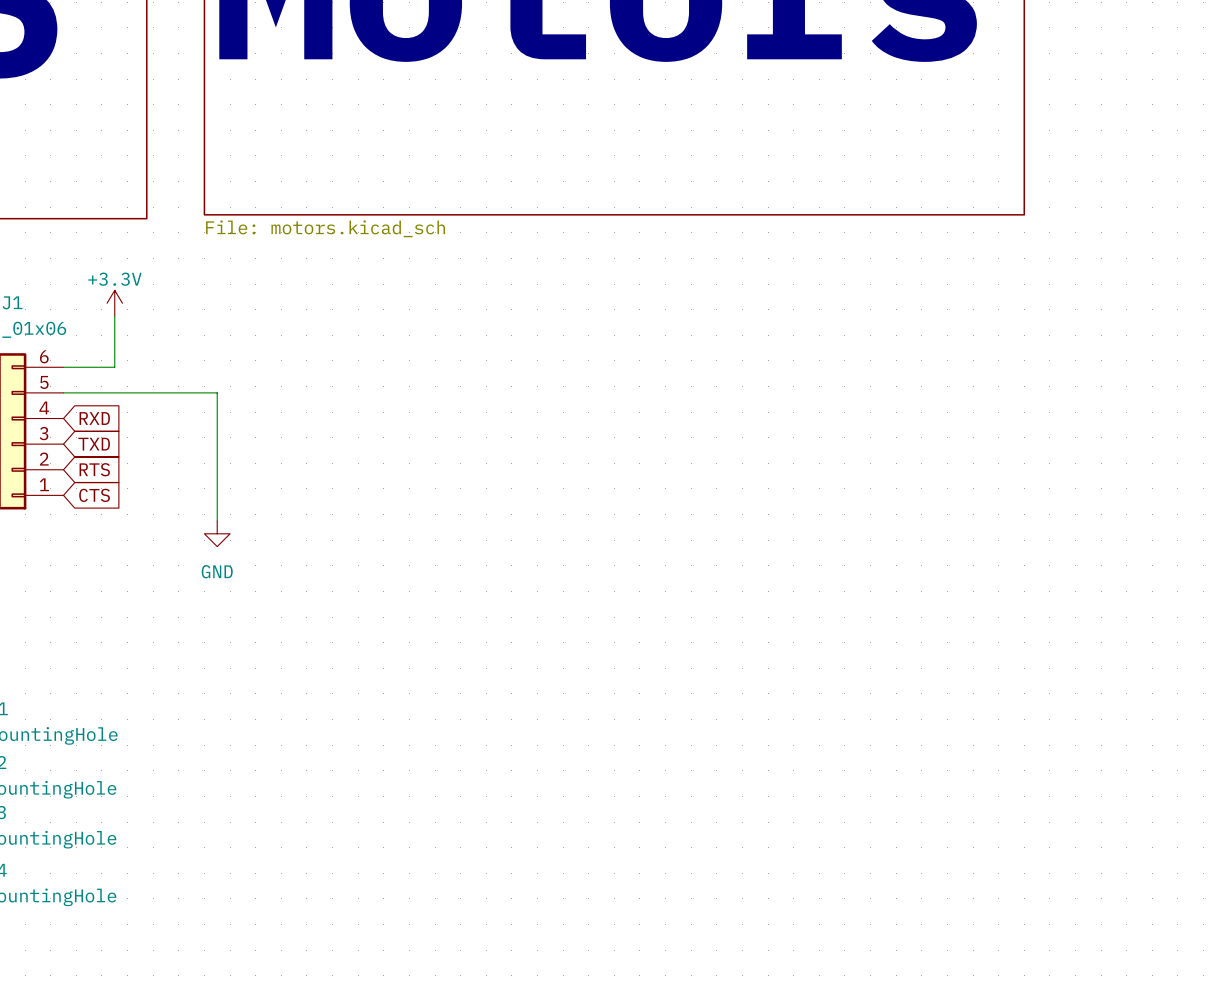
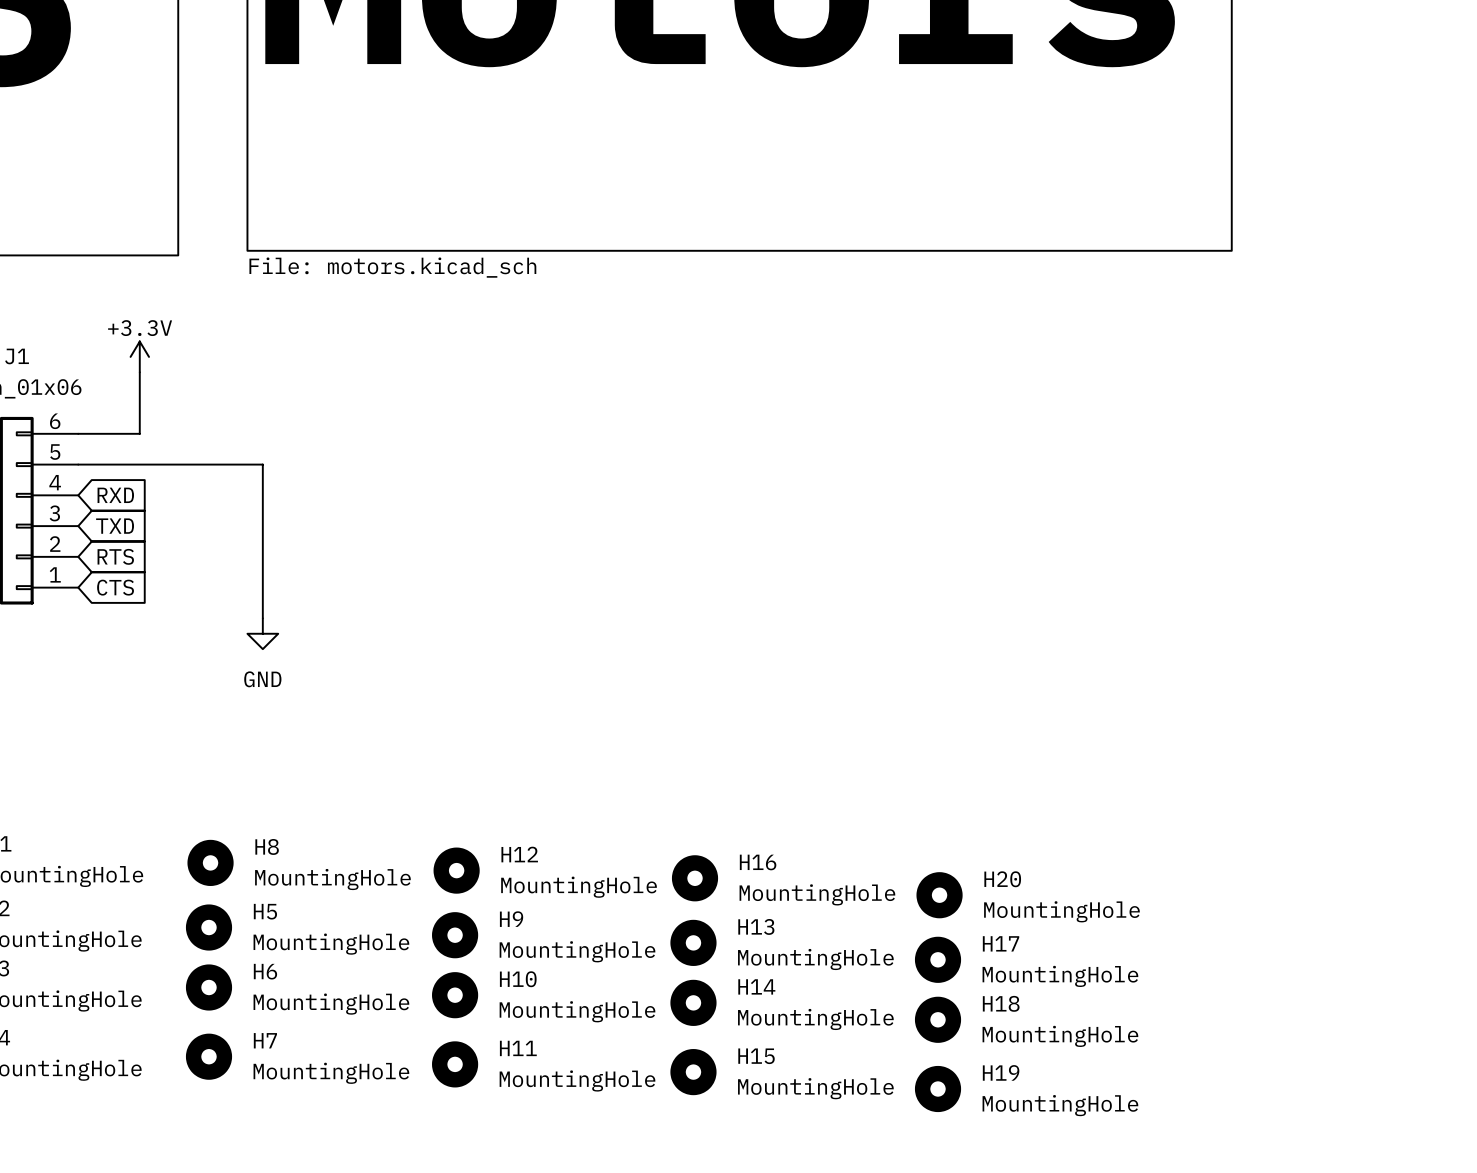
H8: none -> MountingHole (210, 862)
H12: none -> MountingHole (456, 870)
H16: none -> MountingHole (695, 878)
H20: none -> MountingHole (939, 895)
H5: none -> MountingHole (209, 927)
H9: none -> MountingHole (455, 935)
H13: none -> MountingHole (693, 942)
H17: none -> MountingHole (938, 959)
H6: none -> MountingHole (209, 987)
H10: none -> MountingHole (455, 995)
H14: none -> MountingHole (693, 1002)
H18: none -> MountingHole (938, 1019)
H7: none -> MountingHole (209, 1056)
H11: none -> MountingHole (455, 1064)
H15: none -> MountingHole (693, 1072)
H19: none -> MountingHole (938, 1089)

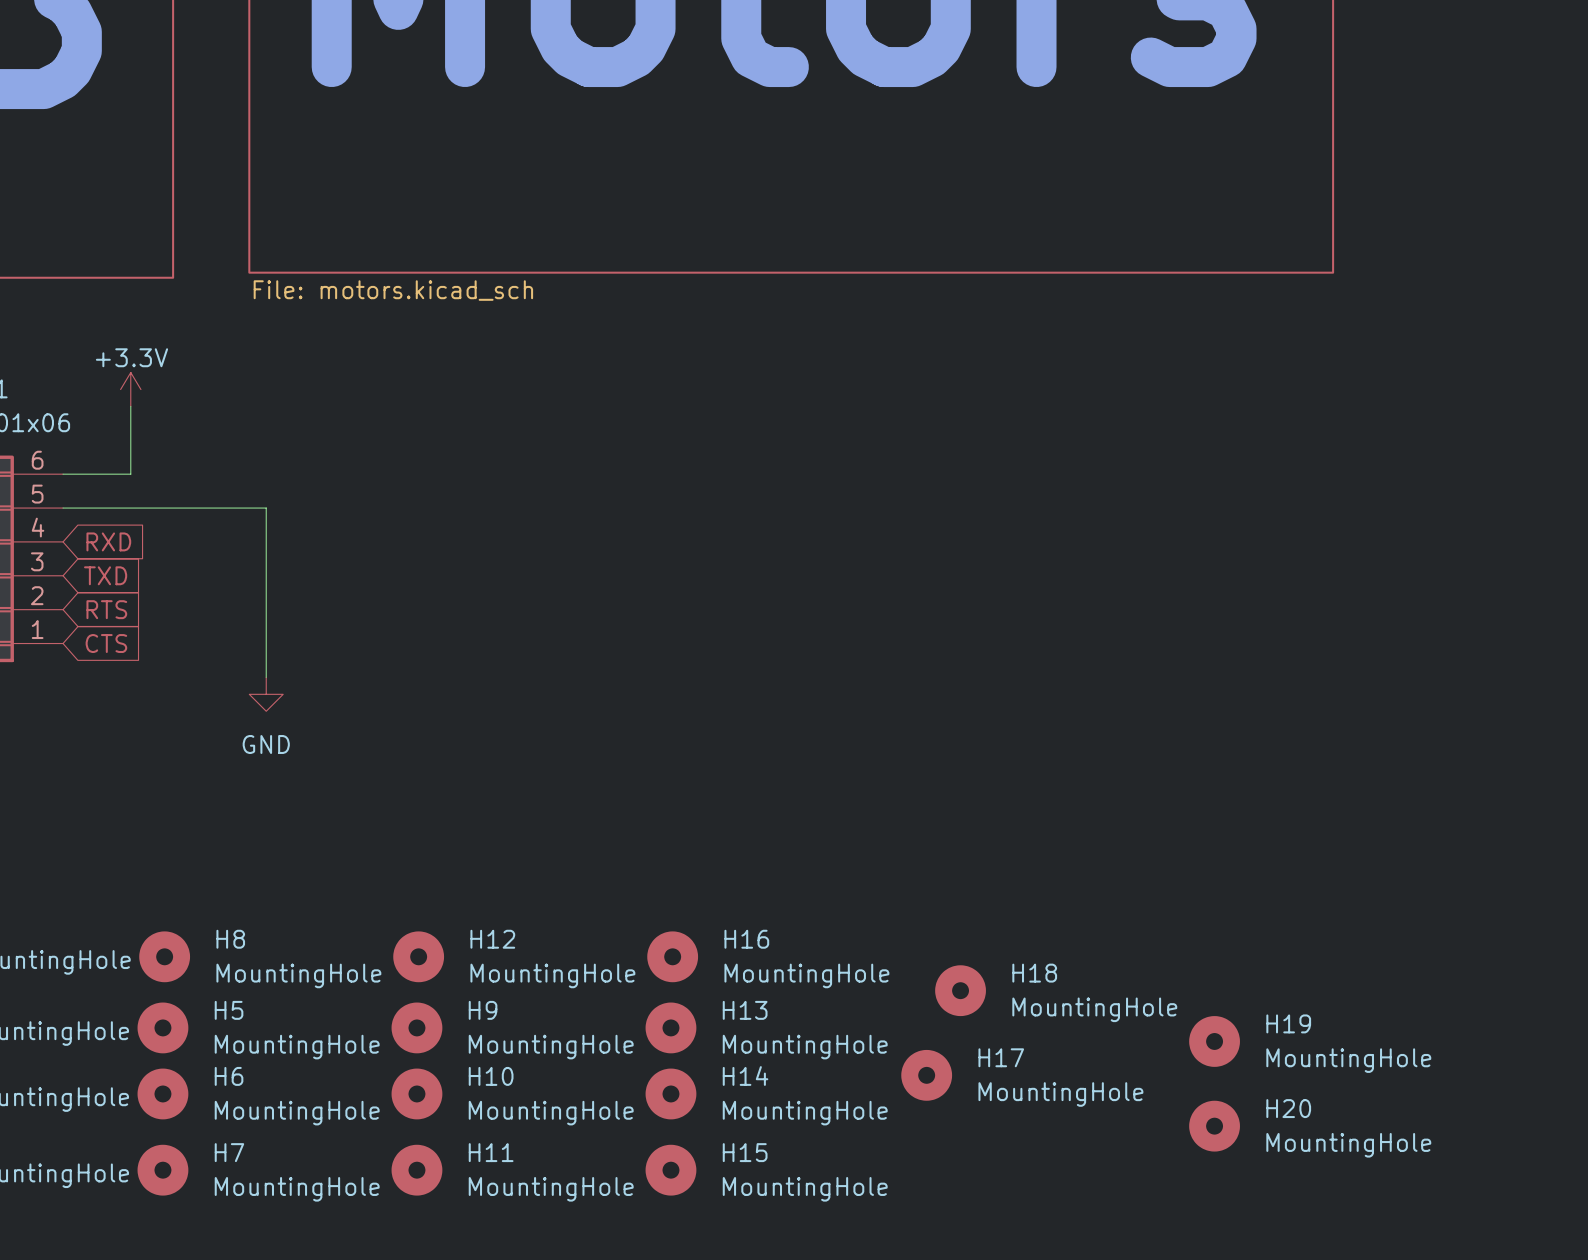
H8 position: (210, 862) -> (164, 956)
H12 position: (456, 870) -> (418, 956)
H16 position: (695, 878) -> (672, 956)
H20 position: (939, 895) -> (1214, 1126)
H5 position: (209, 927) -> (162, 1027)
H9 position: (455, 935) -> (416, 1027)
H13 position: (693, 942) -> (670, 1027)
H17 position: (938, 959) -> (926, 1075)
H6 position: (209, 987) -> (162, 1093)
H10 position: (455, 995) -> (416, 1093)
H14 position: (693, 1002) -> (670, 1093)
H18 position: (938, 1019) -> (960, 990)
H7 position: (209, 1056) -> (162, 1170)
H11 position: (455, 1064) -> (416, 1170)
H15 position: (693, 1072) -> (670, 1170)
H19 position: (938, 1089) -> (1214, 1041)

